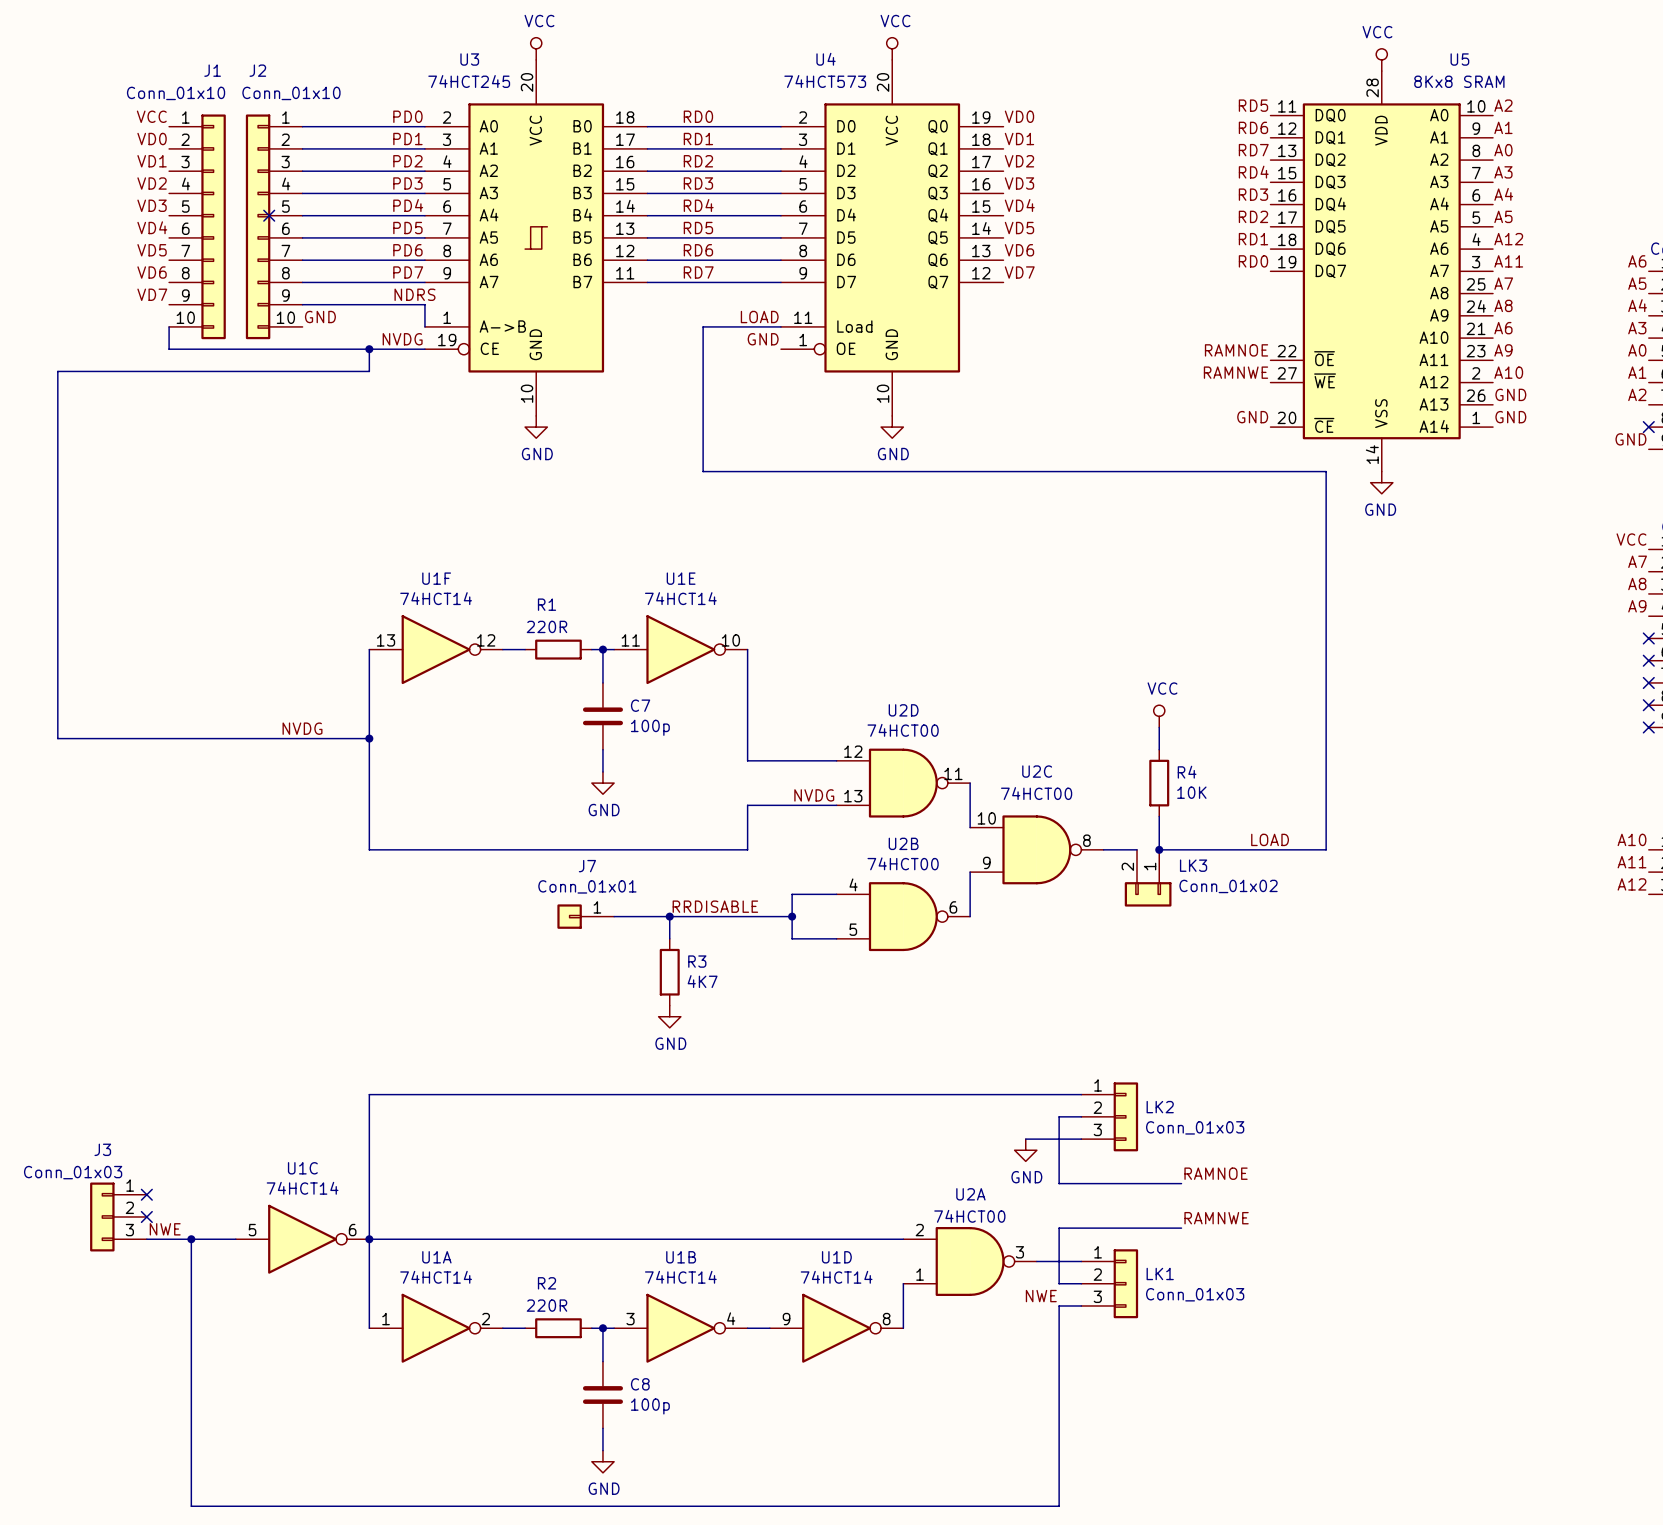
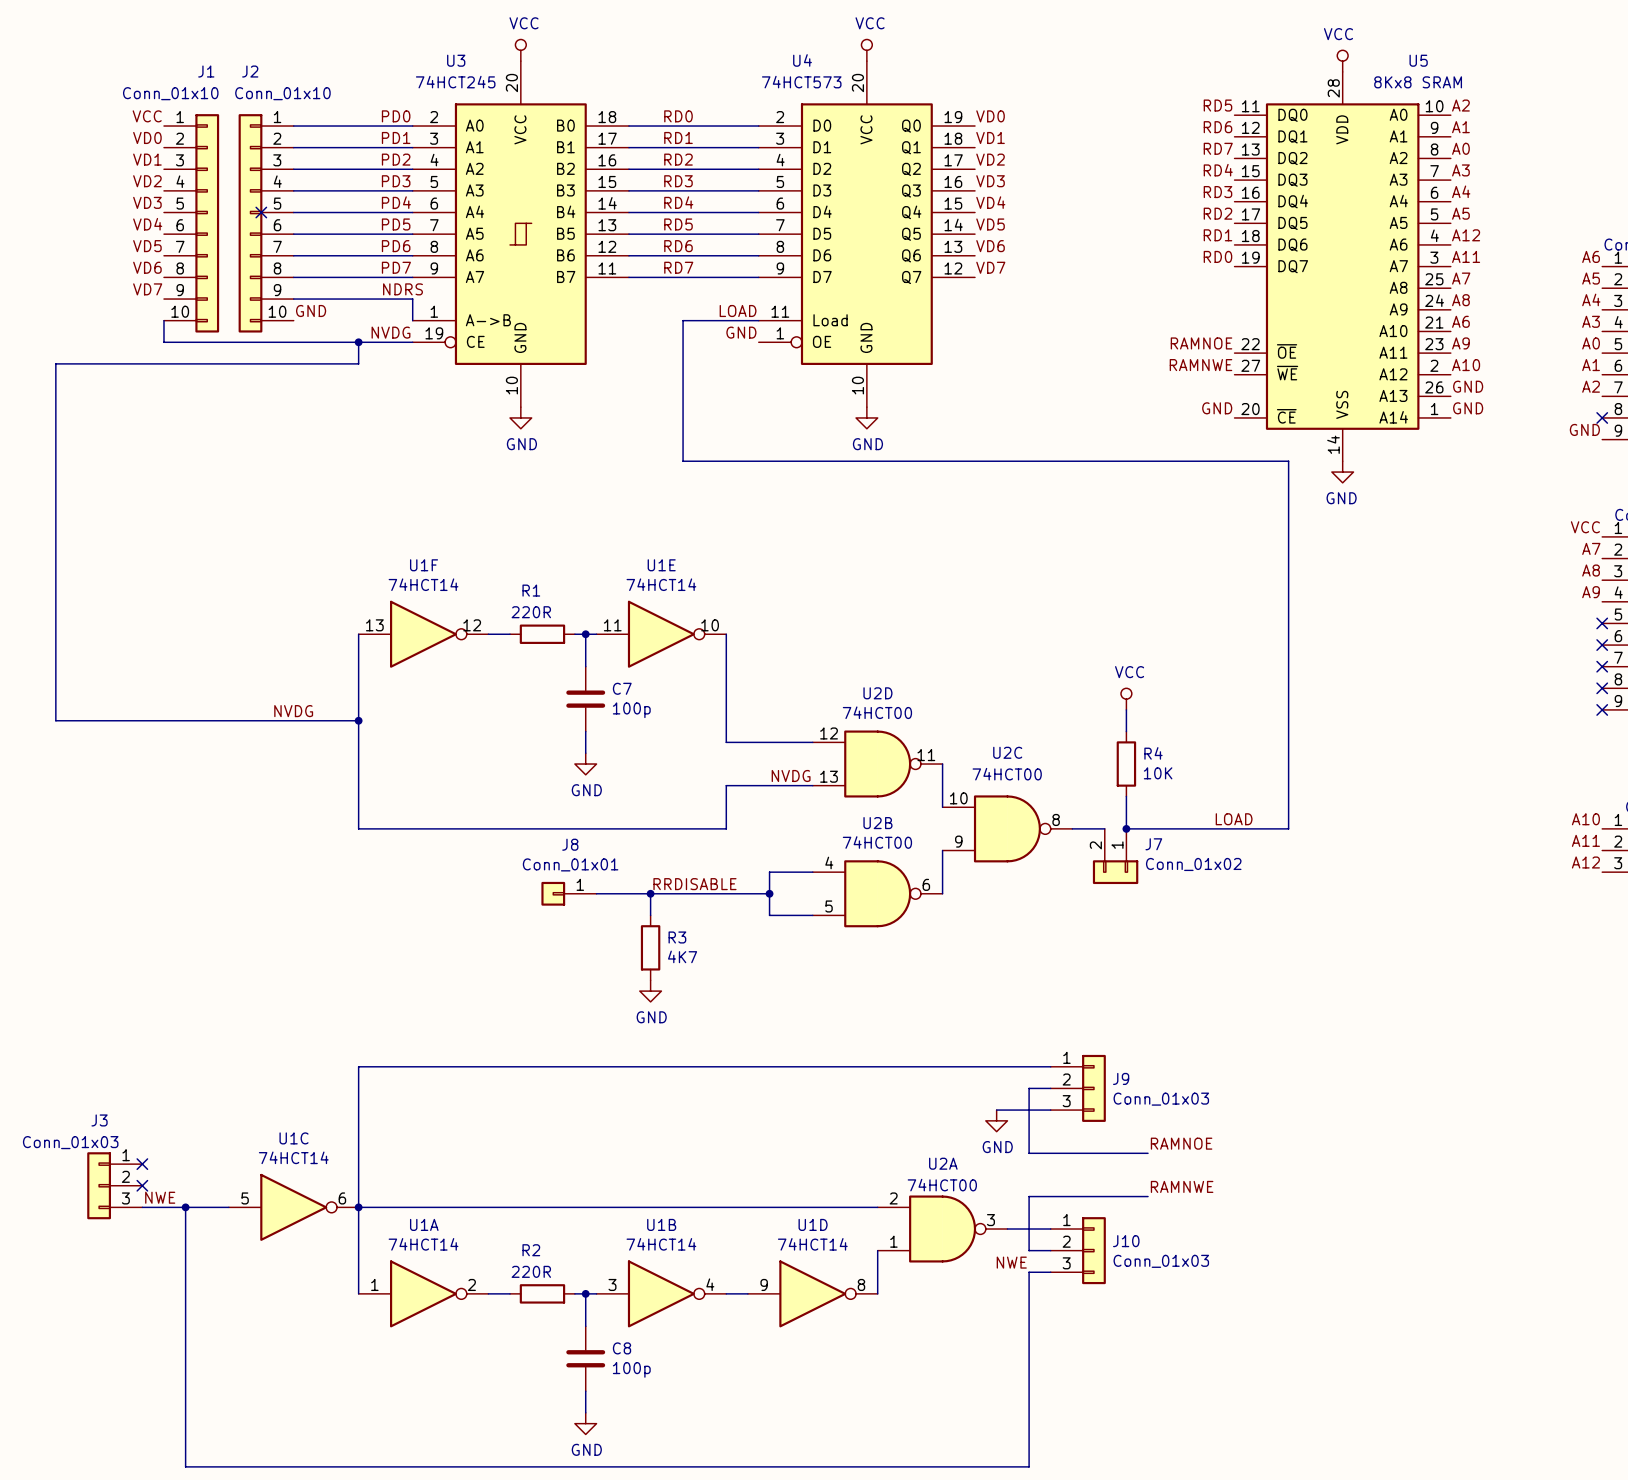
LK3 name: LK3 (1193, 865) -> J7 (1153, 844)
J7 name: J7 (587, 866) -> J8 (570, 844)
LK2 name: LK2 (1160, 1107) -> J9 (1121, 1078)
LK1 name: LK1 (1160, 1273) -> J10 (1126, 1241)

